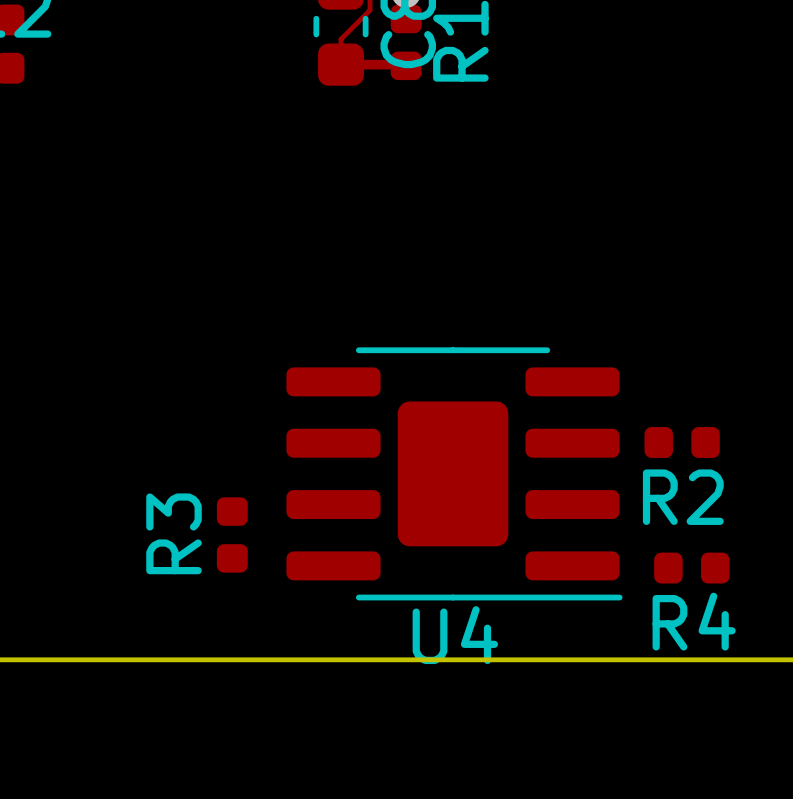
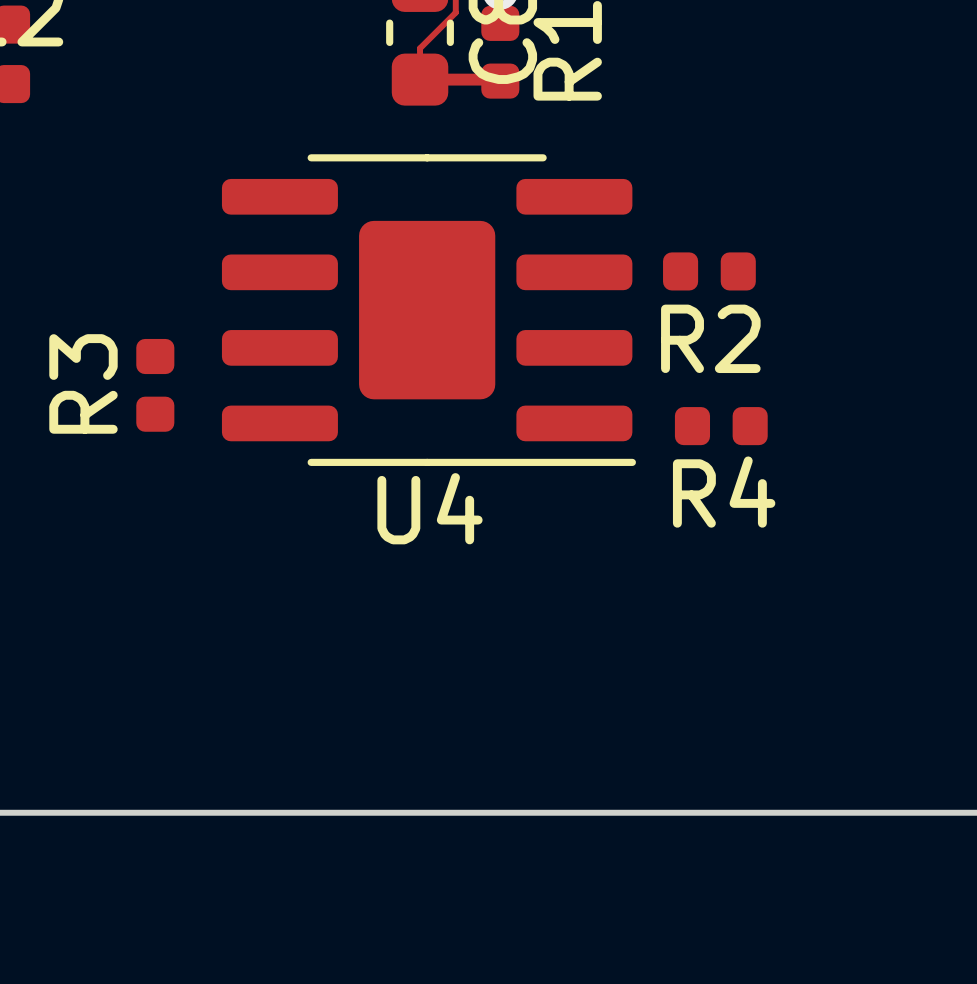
R2 position: (682, 442) -> (709, 271)
U4 position: (454, 473) -> (428, 310)
R3 position: (232, 534) -> (155, 385)
R4 position: (691, 568) -> (721, 426)

